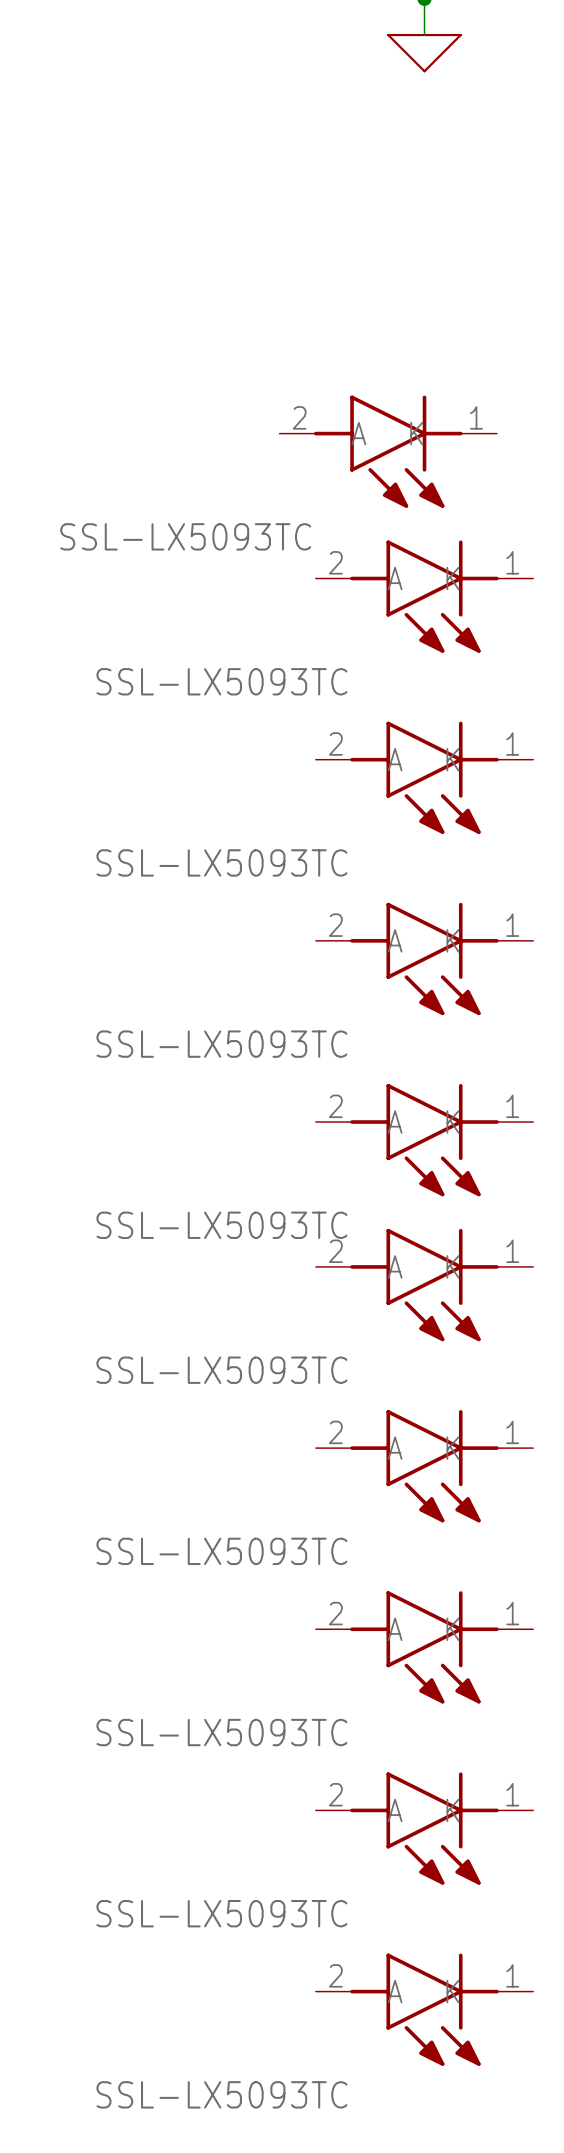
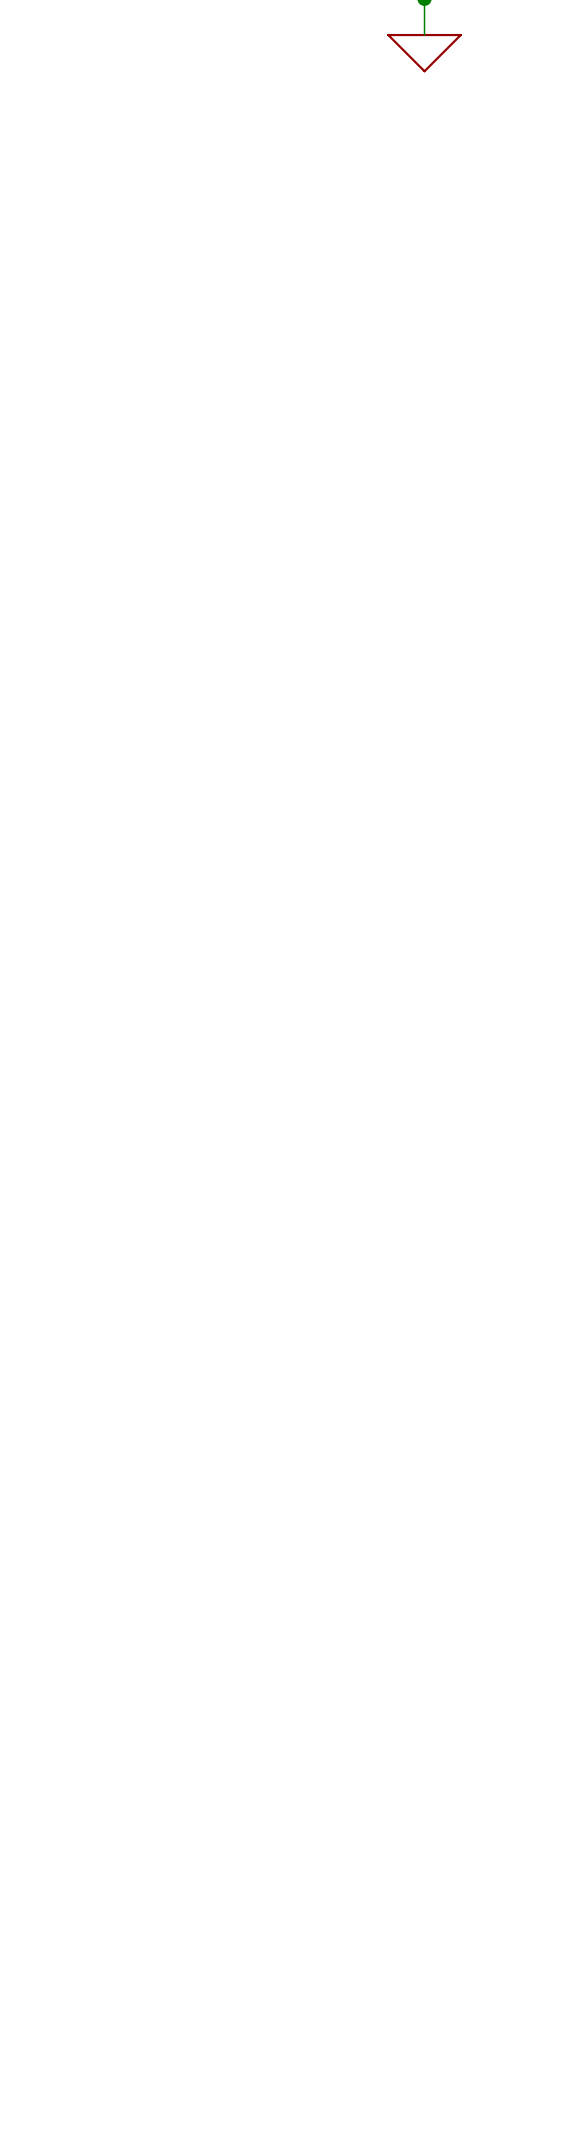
part: SSL-LX5093TC (388, 451) -> none
part: SSL-LX5093TC (424, 596) -> none
part: SSL-LX5093TC (424, 777) -> none
part: SSL-LX5093TC (424, 958) -> none
part: SSL-LX5093TC (424, 1140) -> none
part: SSL-LX5093TC (424, 1285) -> none
part: SSL-LX5093TC (424, 1466) -> none
part: SSL-LX5093TC (424, 1647) -> none
part: SSL-LX5093TC (424, 1828) -> none
part: SSL-LX5093TC (424, 2009) -> none

